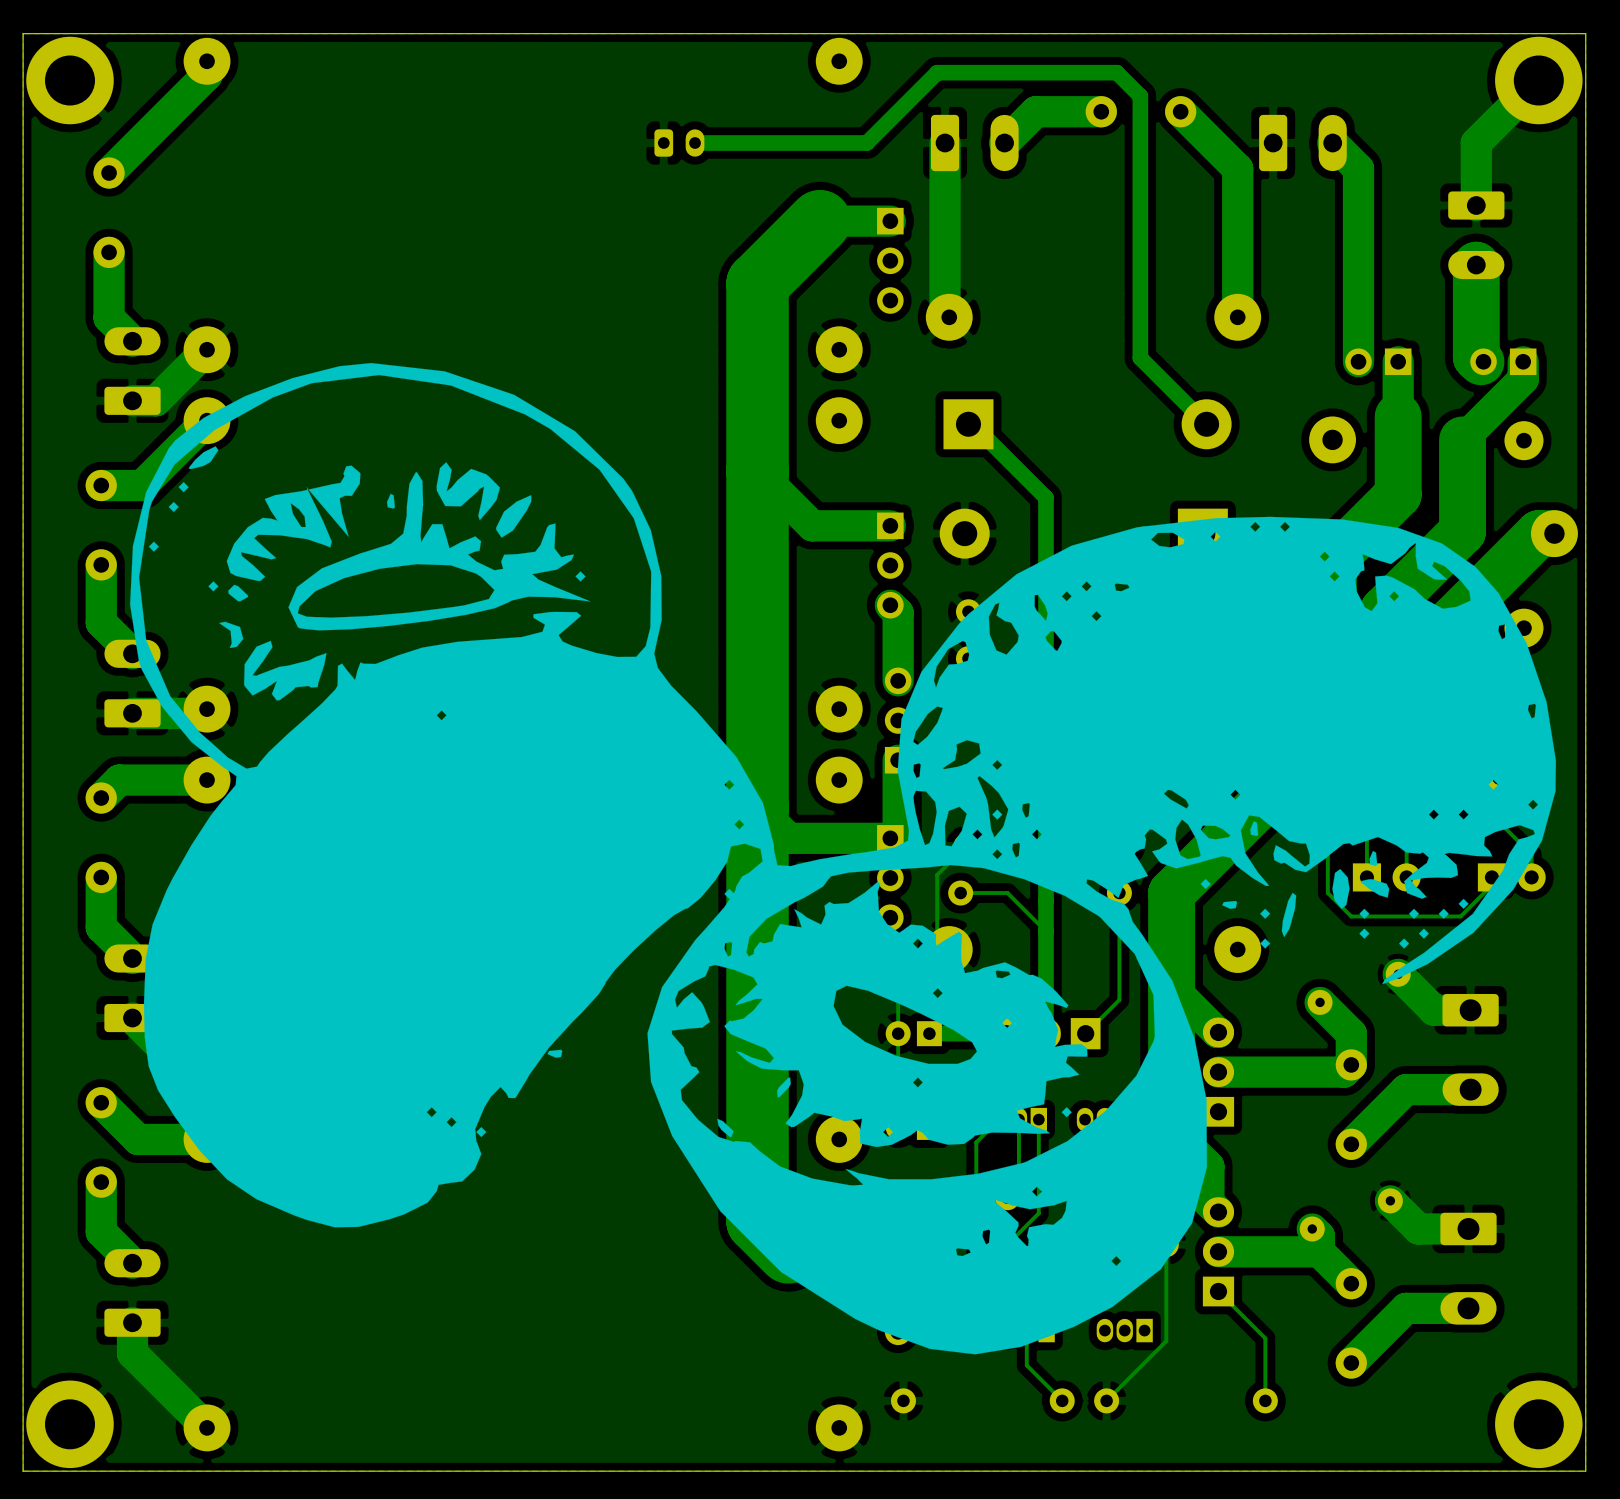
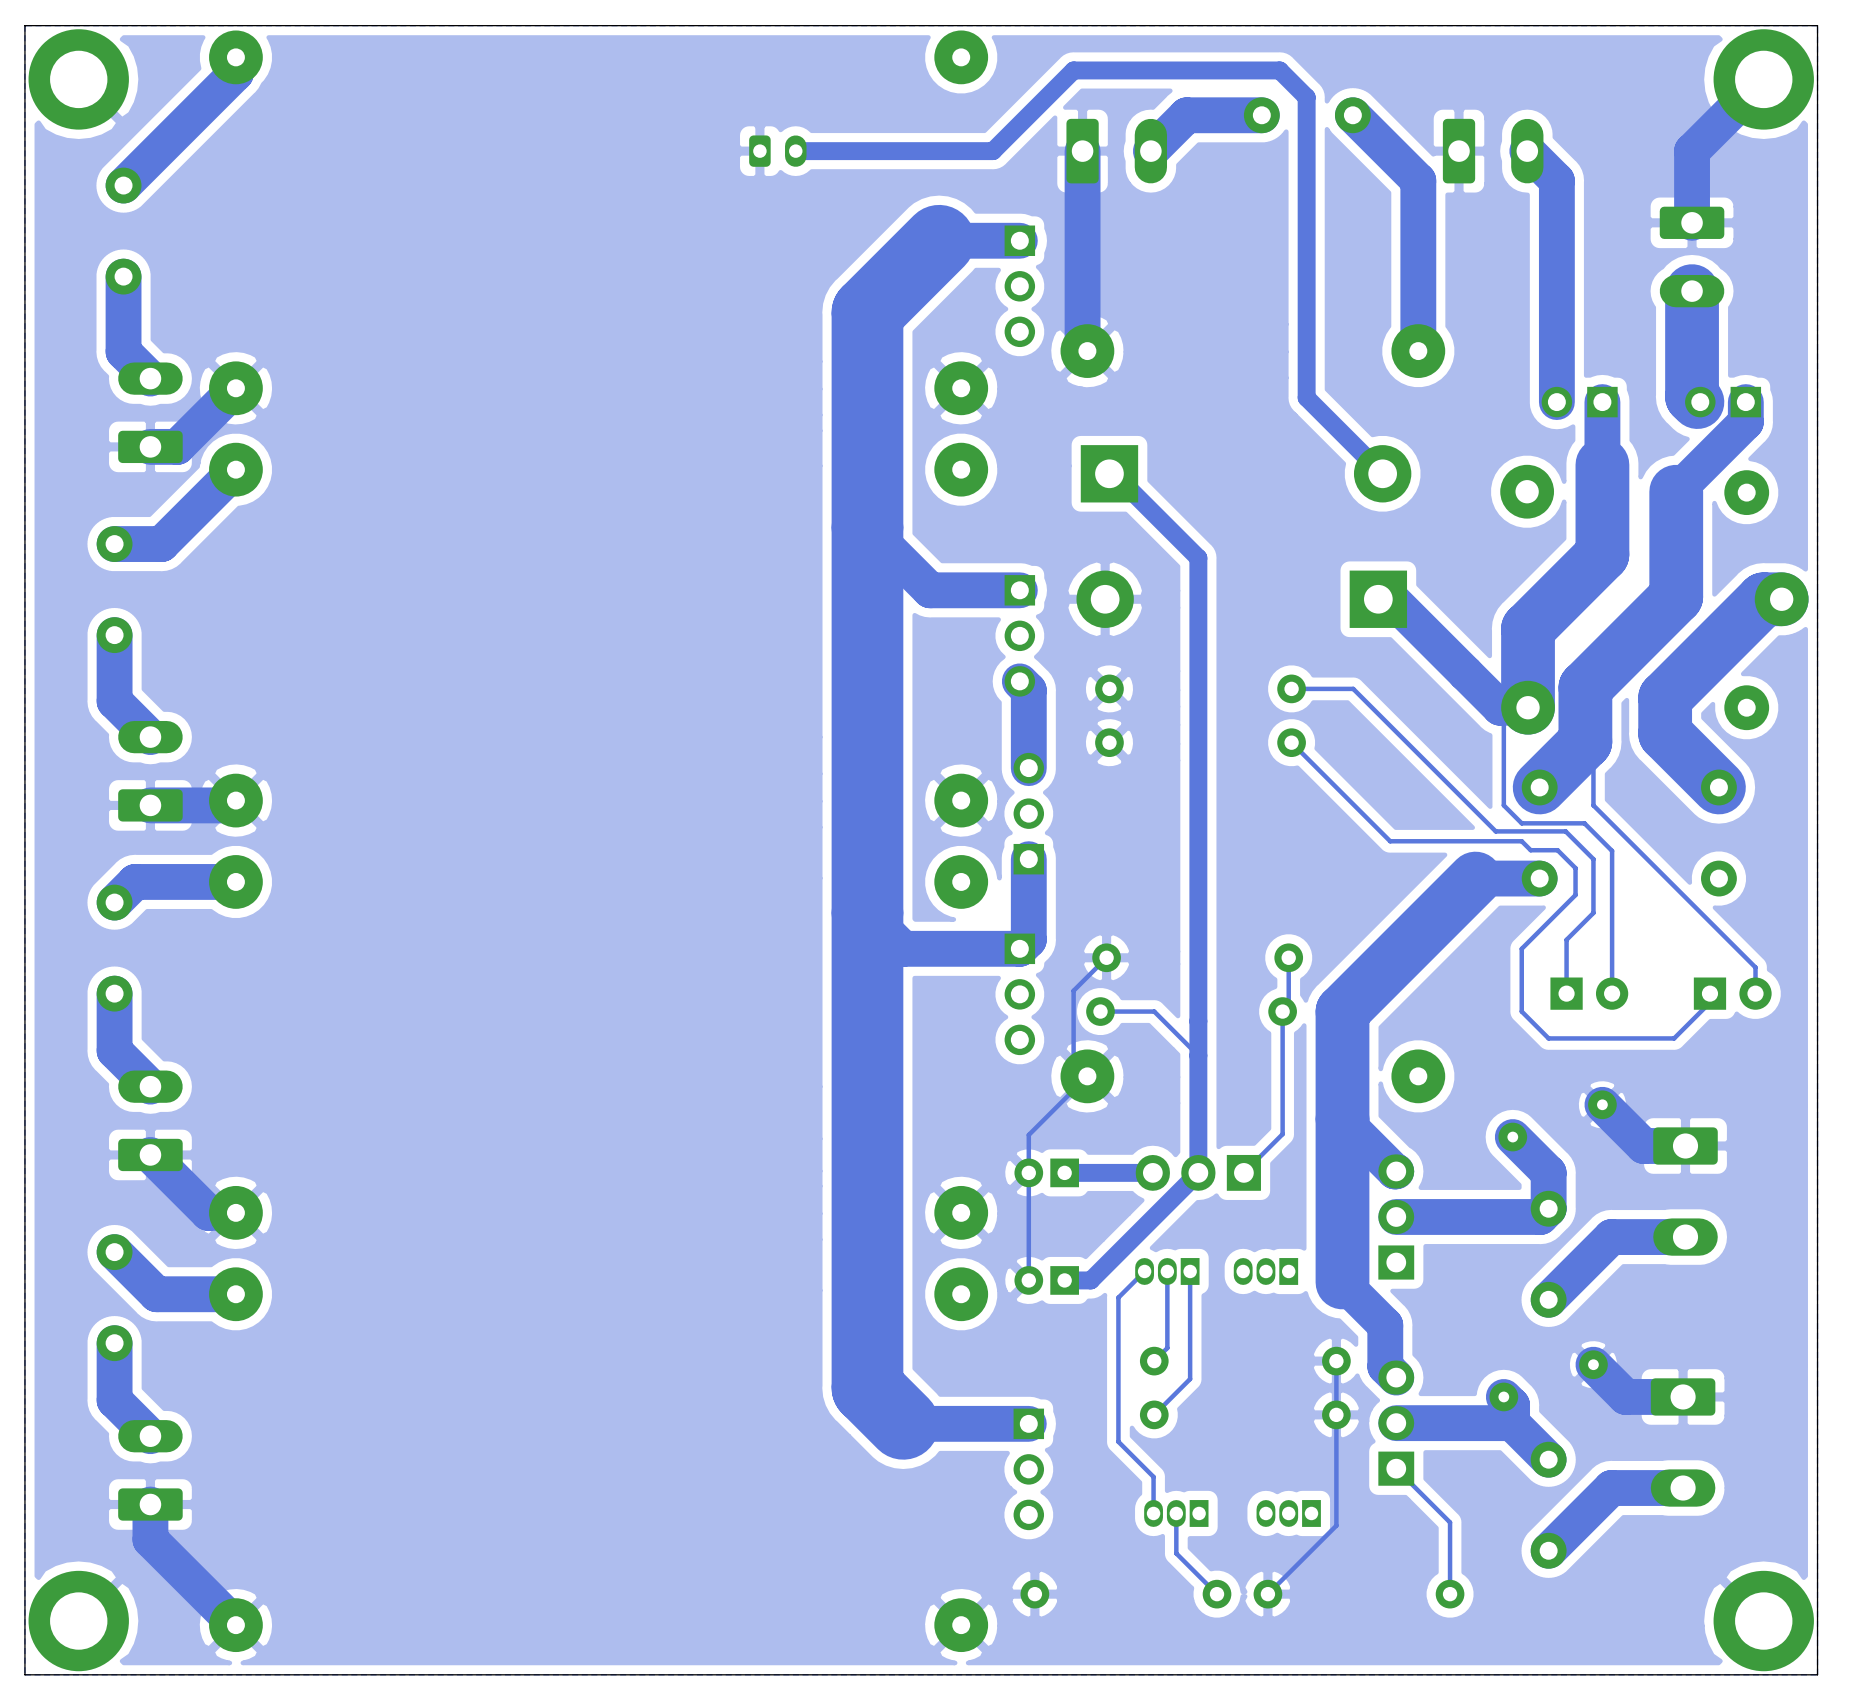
drawing: [130, 363, 1556, 1355] -> none

